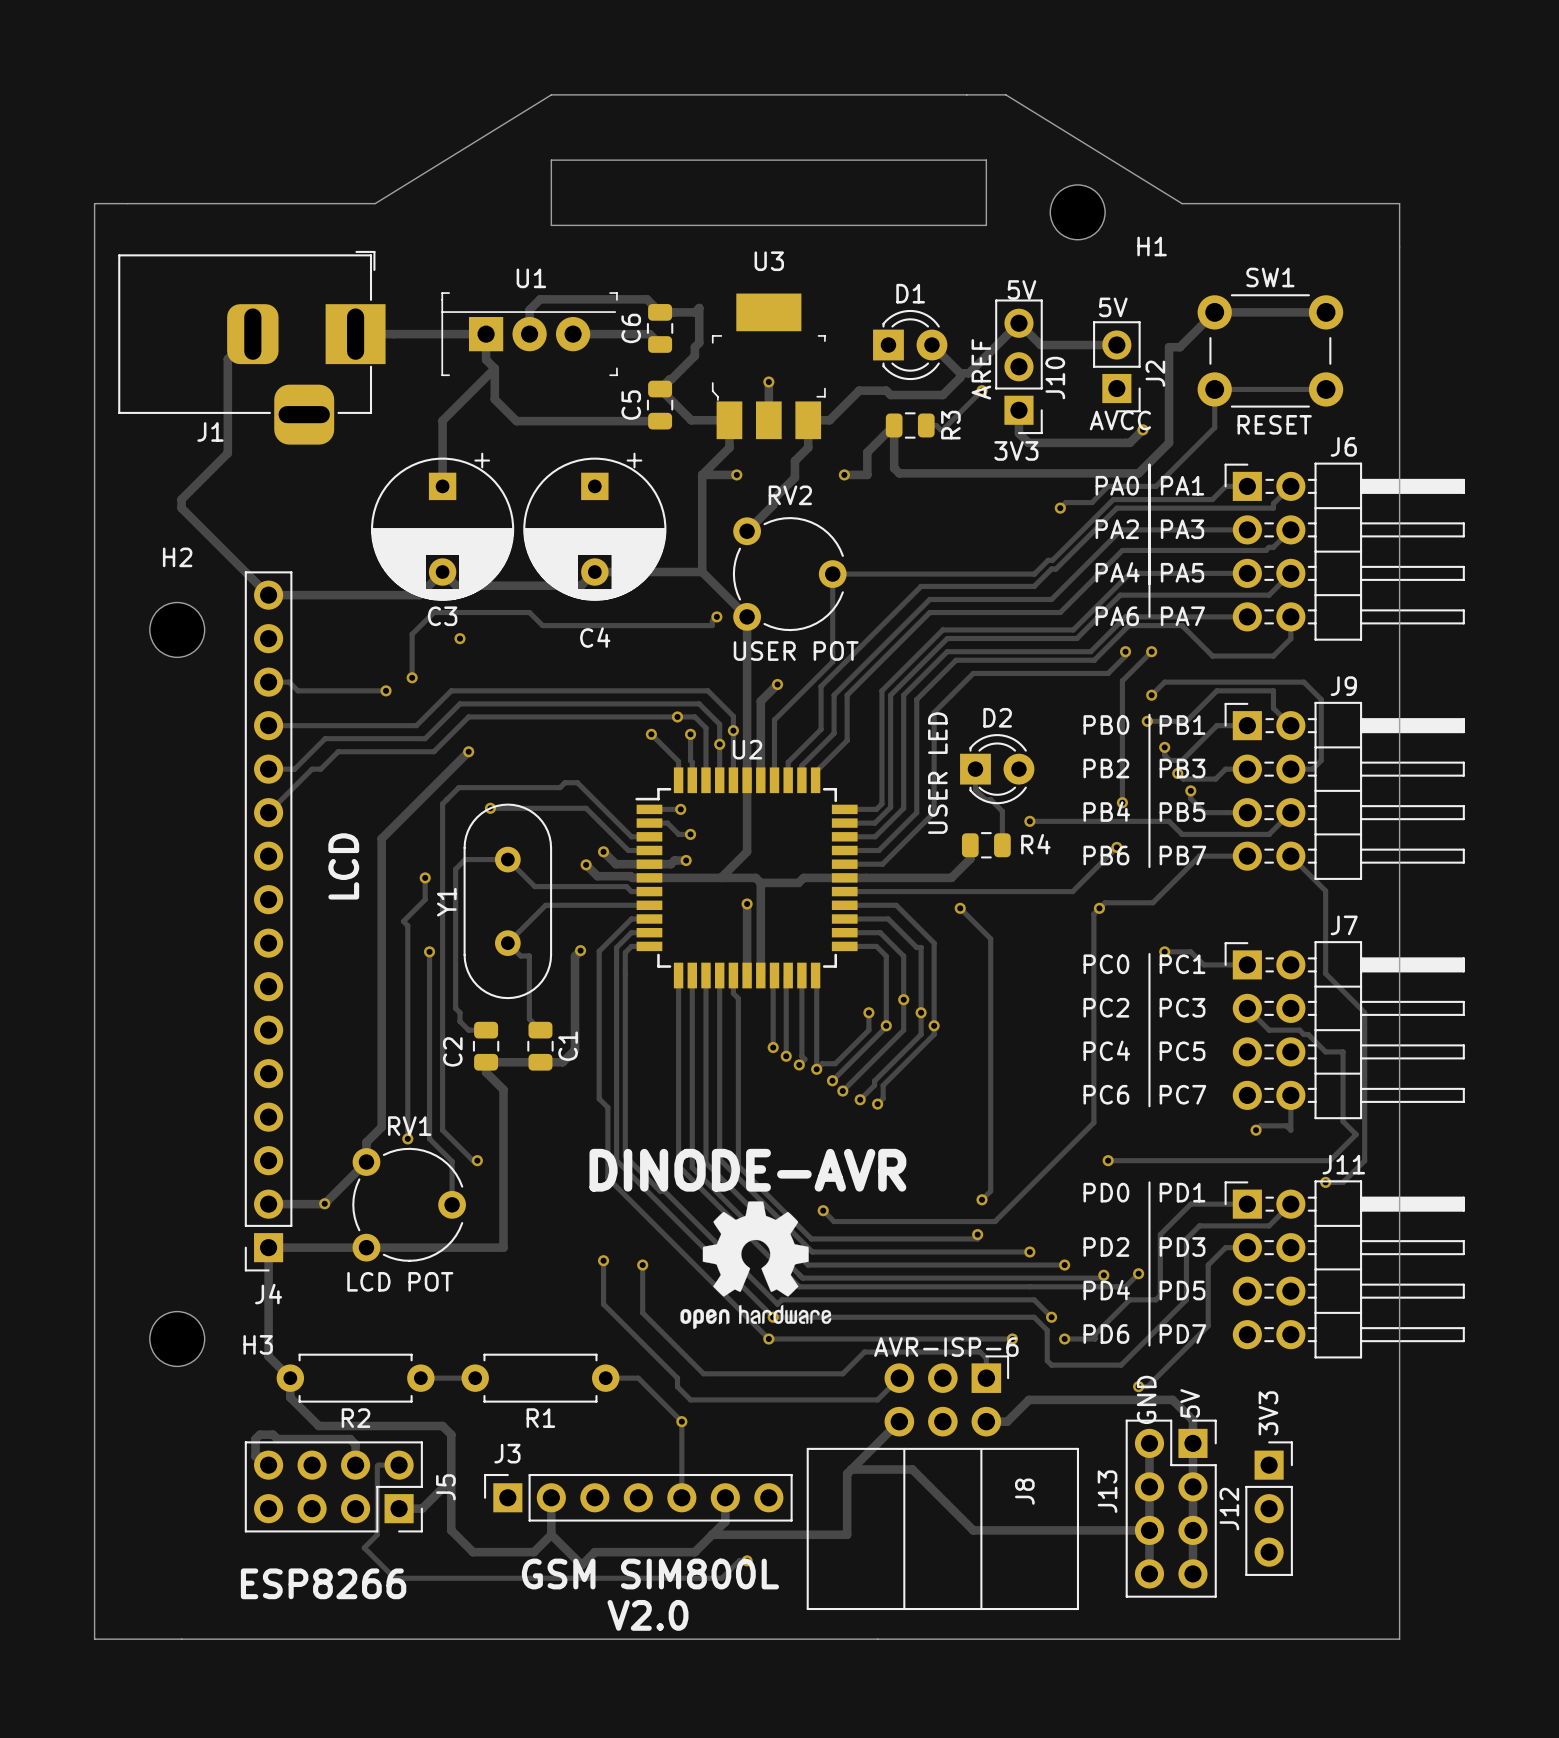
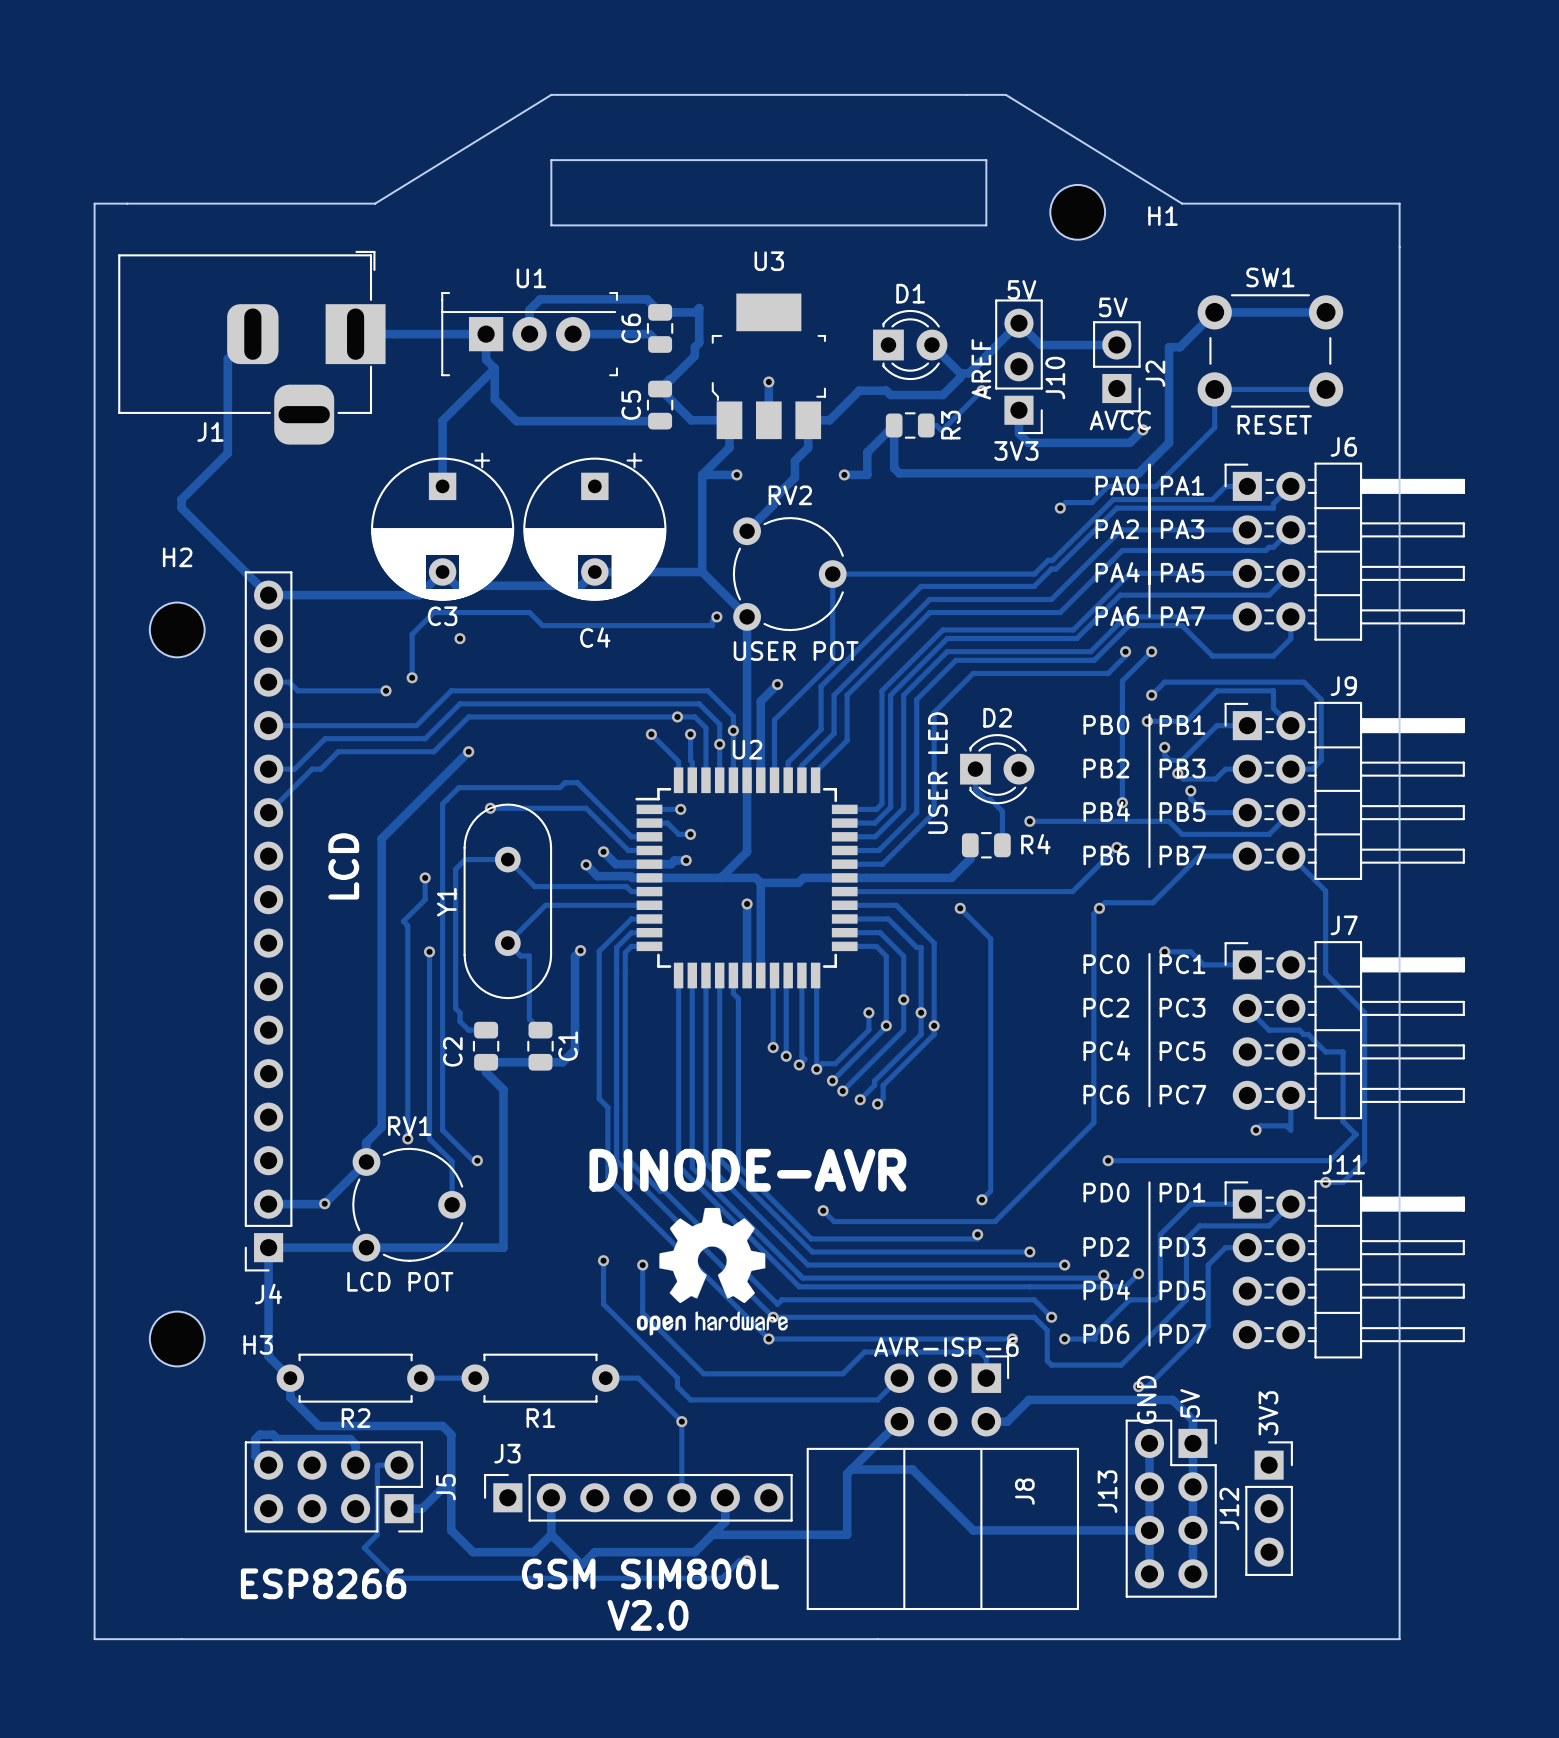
H1 name position: H1 (1152, 246) -> H1 (1162, 216)
drawing position: (755, 1265) -> (712, 1271)

